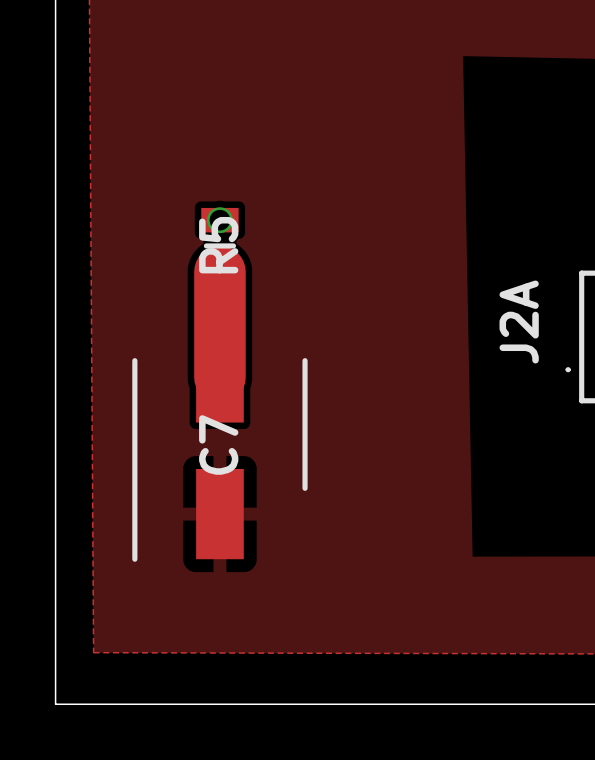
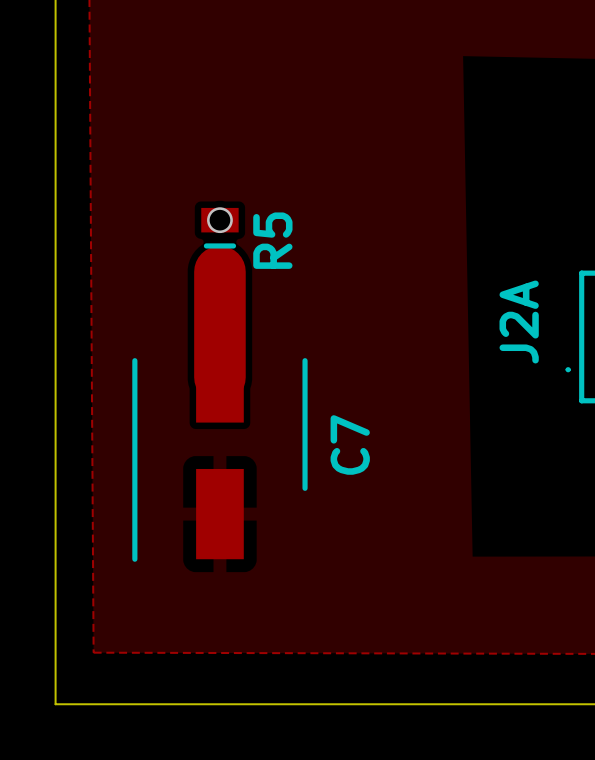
R5 name position: R5 (218, 245) -> R5 (272, 240)
C7 name position: C7 (218, 444) -> C7 (350, 444)

